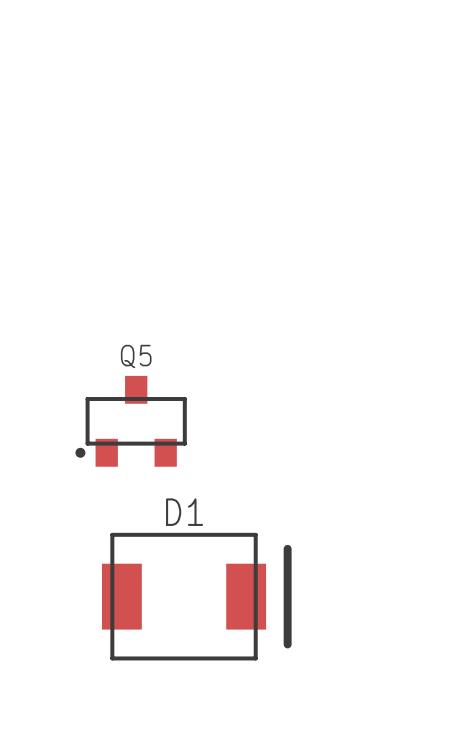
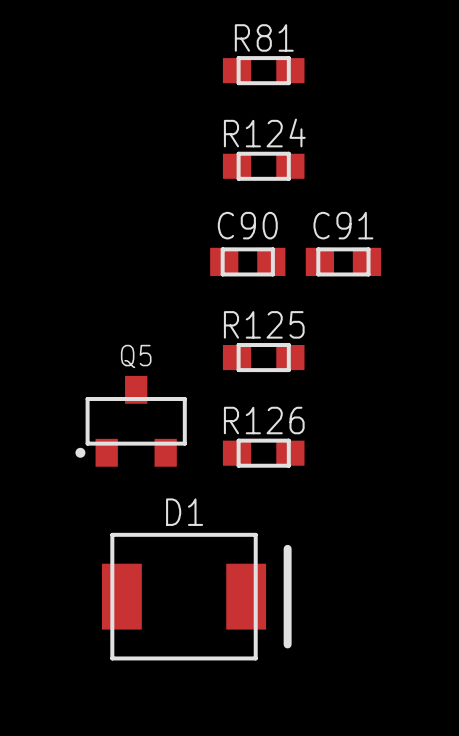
R81: none -> (263, 70)
R124: none -> (263, 166)
C90: none -> (247, 261)
C91: none -> (343, 261)
R125: none -> (263, 357)
R126: none -> (263, 453)

